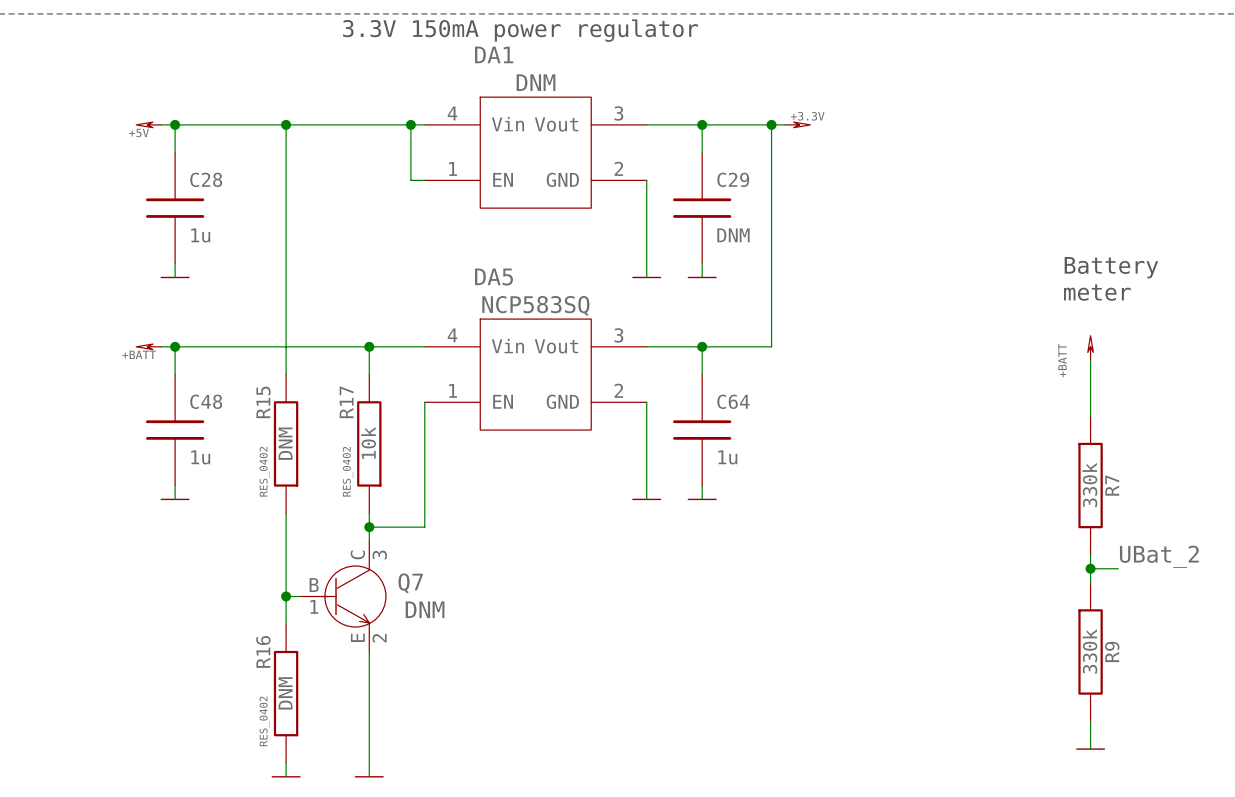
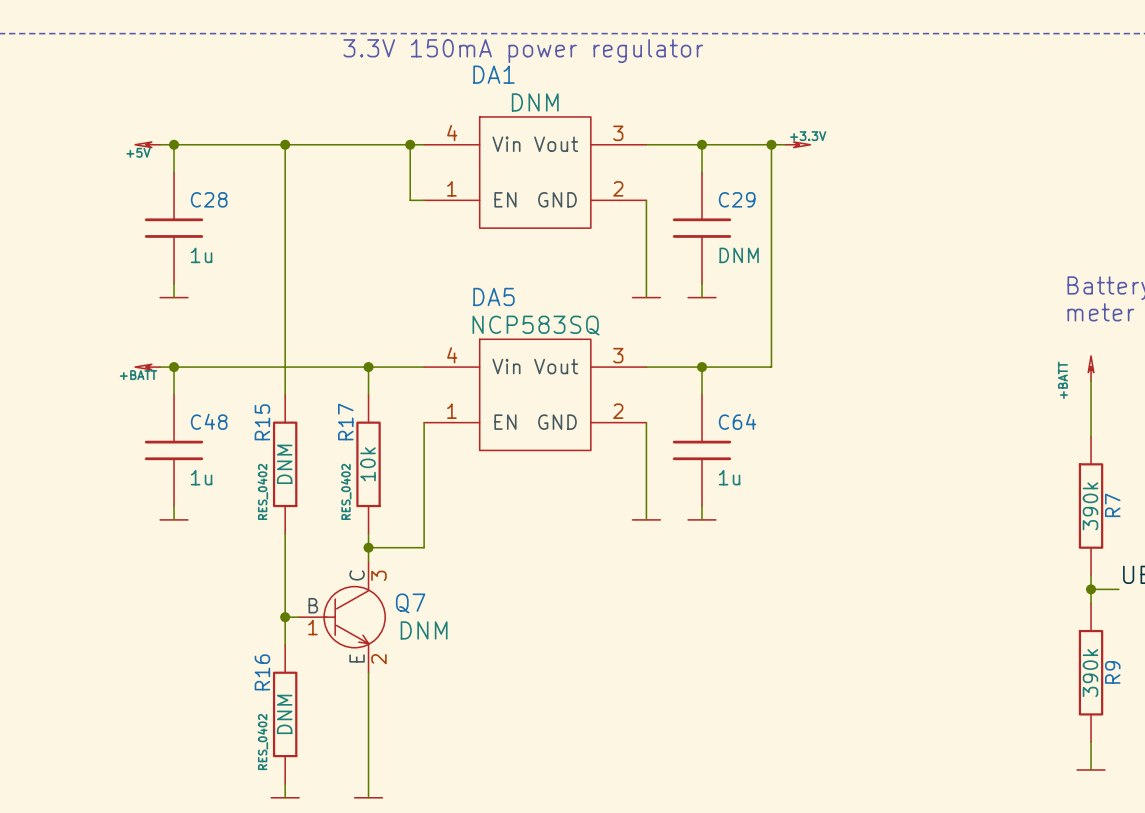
R7 value: 330k (1089, 485) -> 390k (1090, 506)
R9 value: 330k (1089, 651) -> 390k (1090, 673)

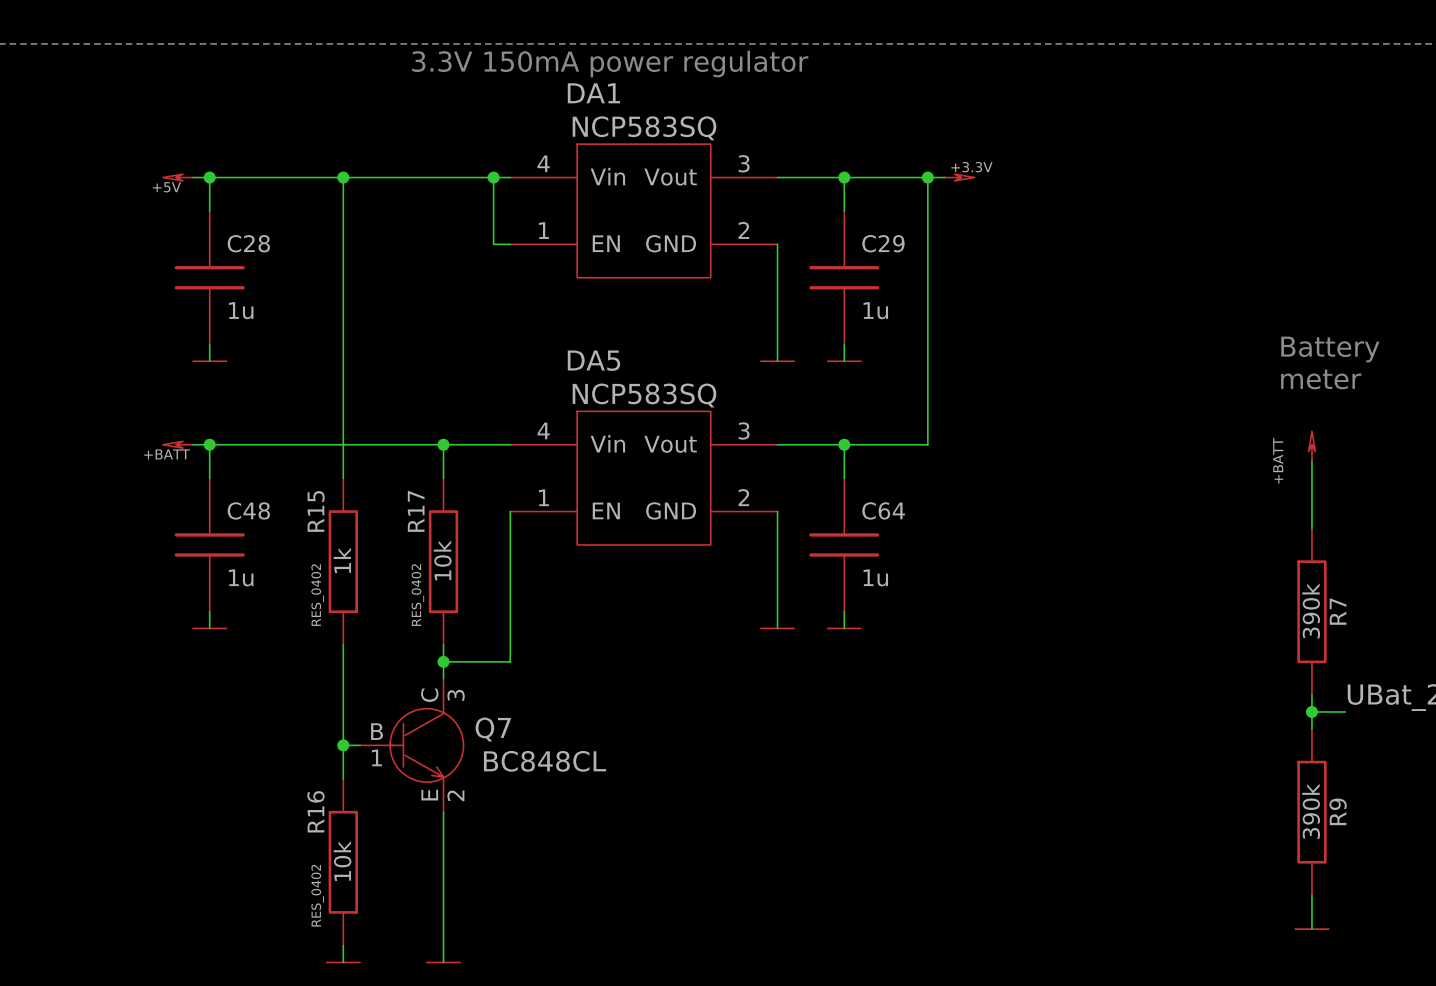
DA1 value: DNM (535, 102) -> NCP583SQ (644, 128)
C29 value: DNM (739, 255) -> 1u (875, 310)
R15 value: DNM (284, 464) -> 1k (342, 560)
Q7 value: DNM (424, 630) -> BC848CL (545, 761)
R16 value: DNM (284, 714) -> 10k (342, 861)

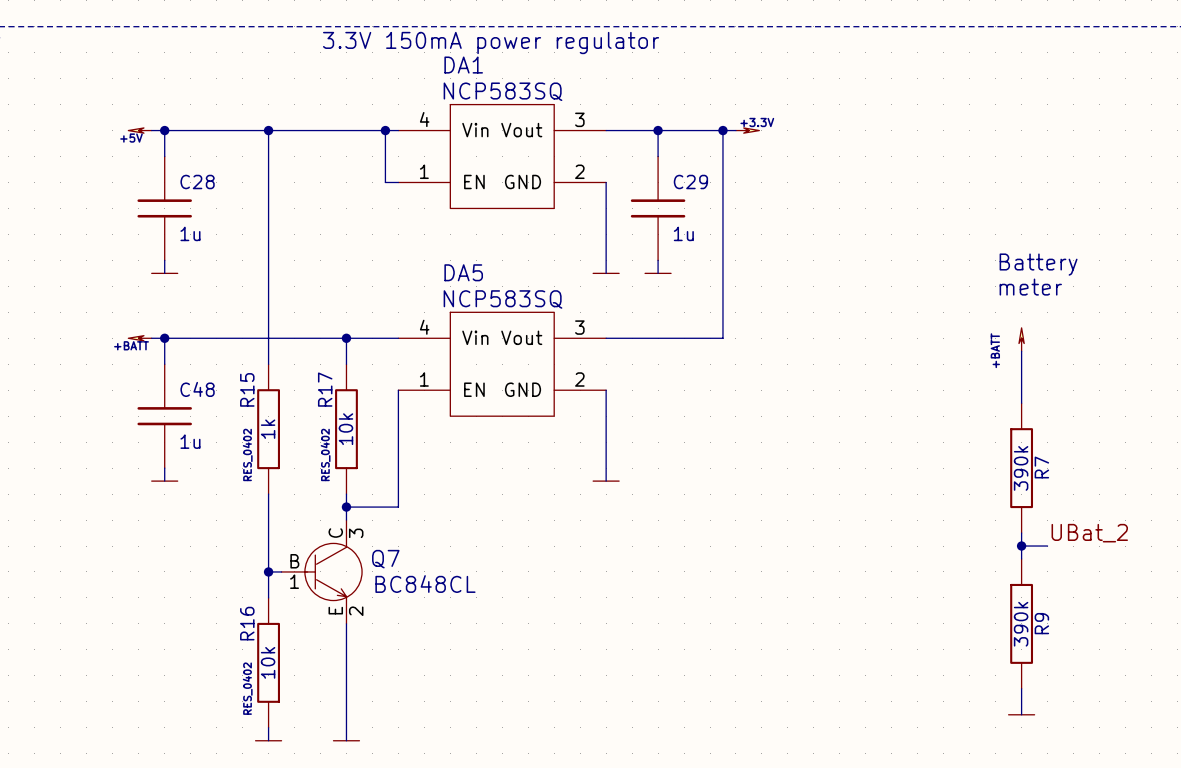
wire: (844, 444) (844, 478) -> none
junction: (844, 444) -> none
C64: 1u (844, 544) -> none
wire: (844, 611) (844, 628) -> none
power symbol: (844, 628) -> none

